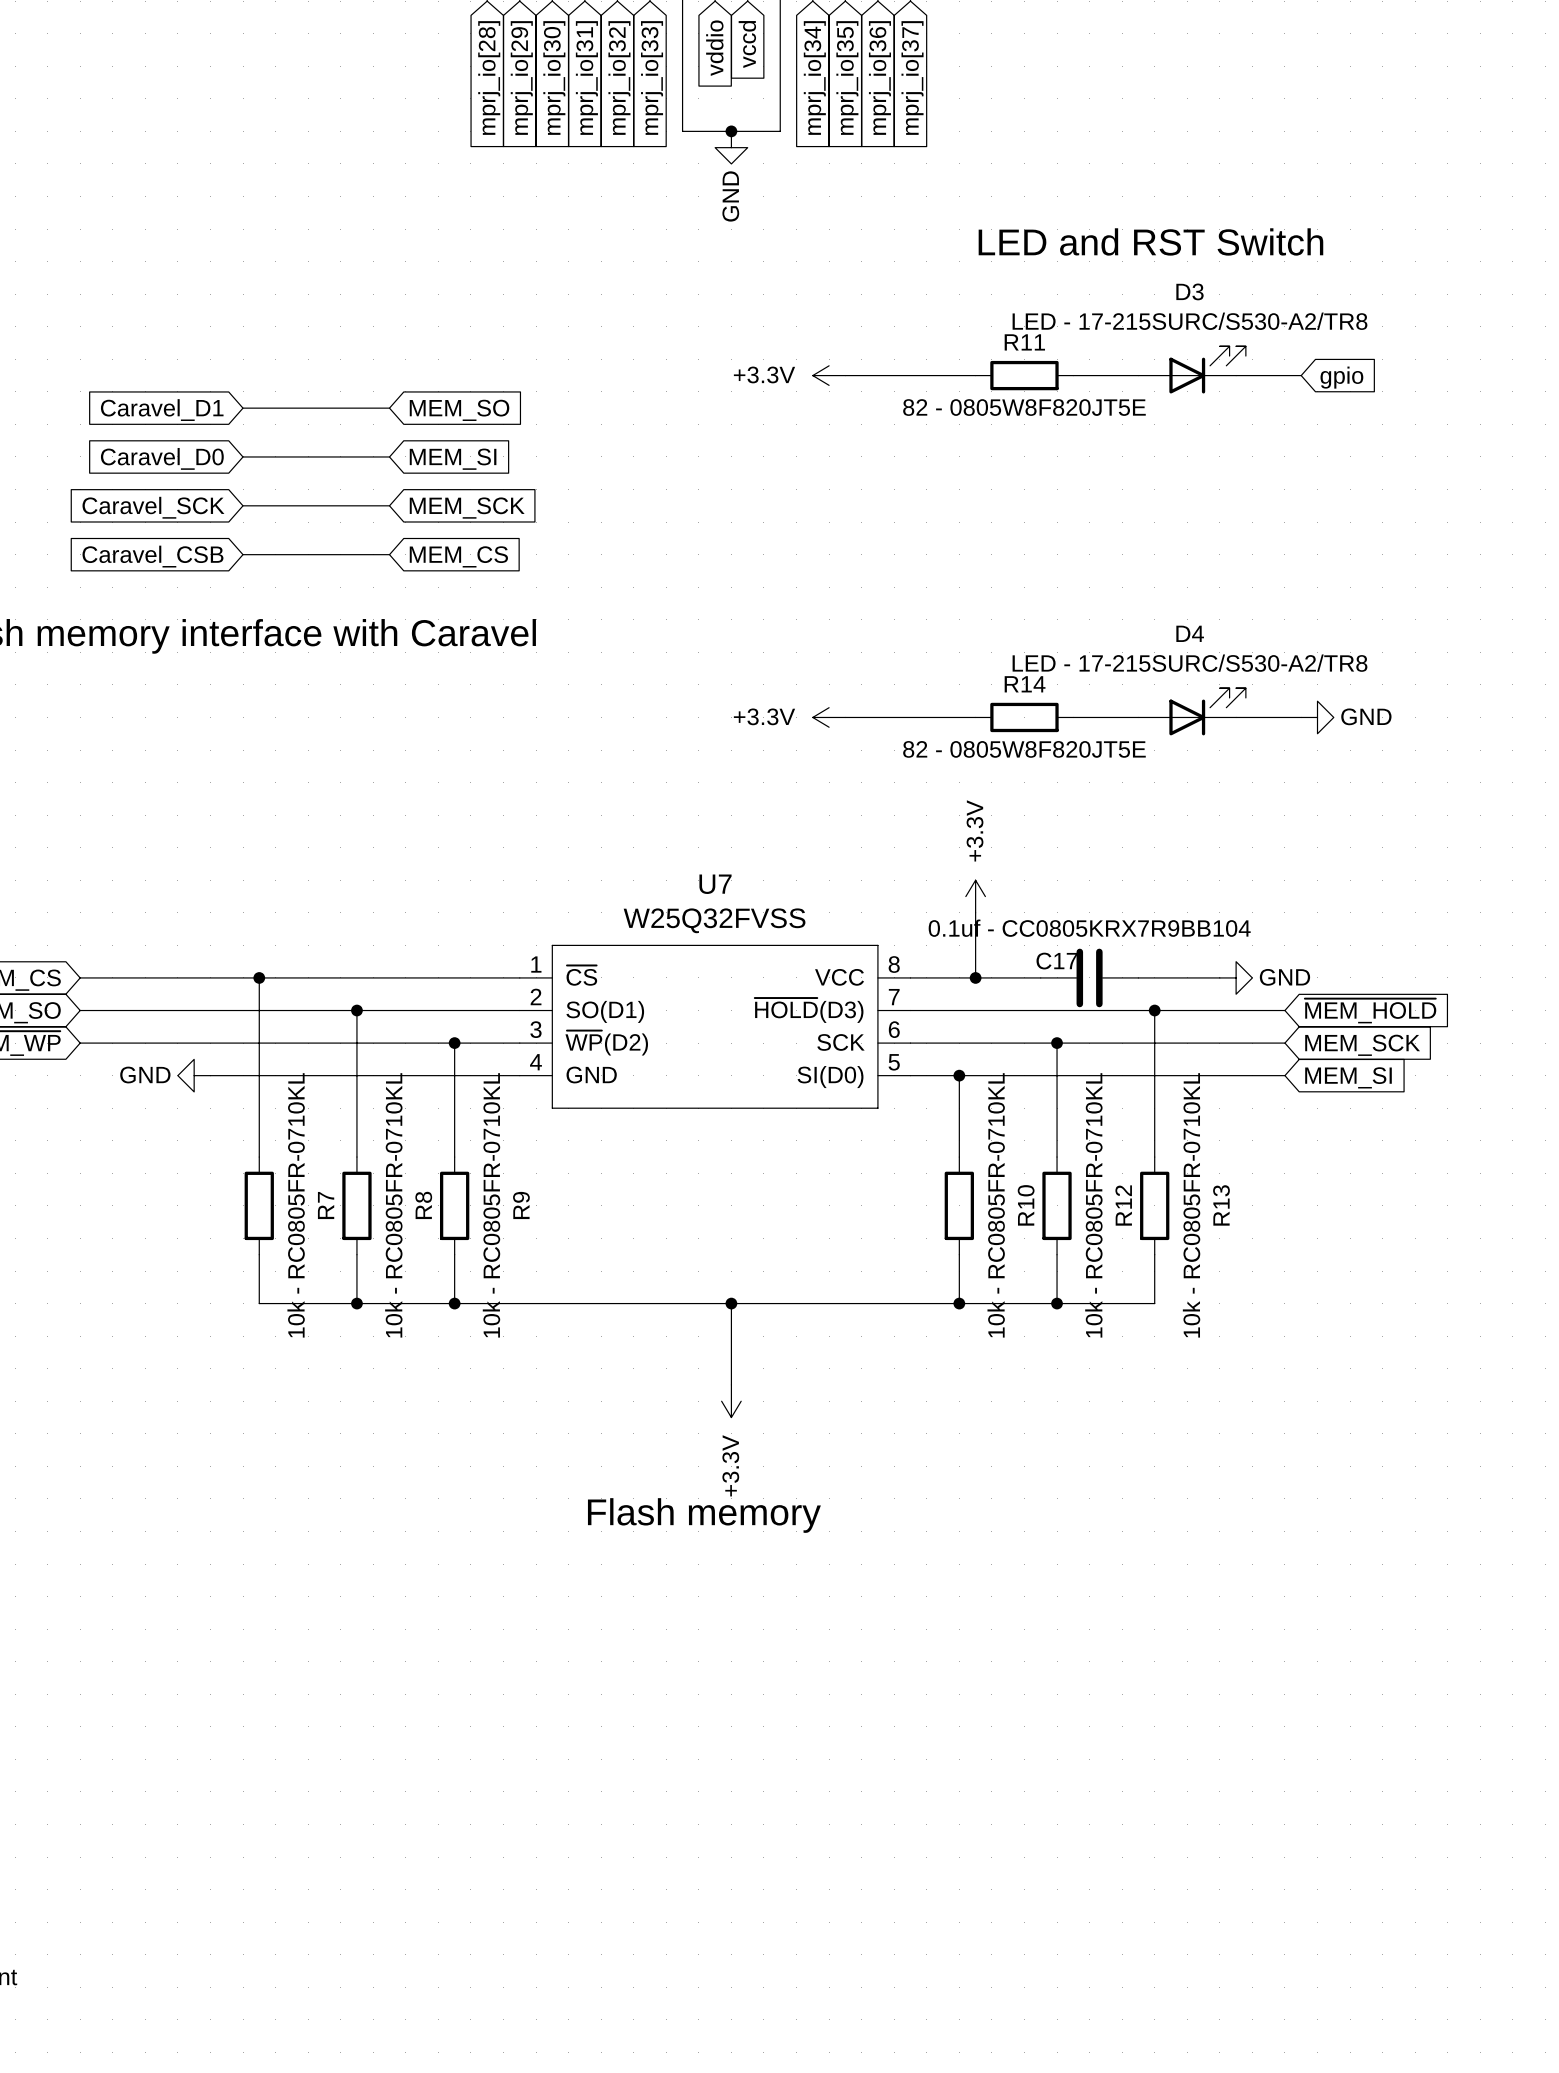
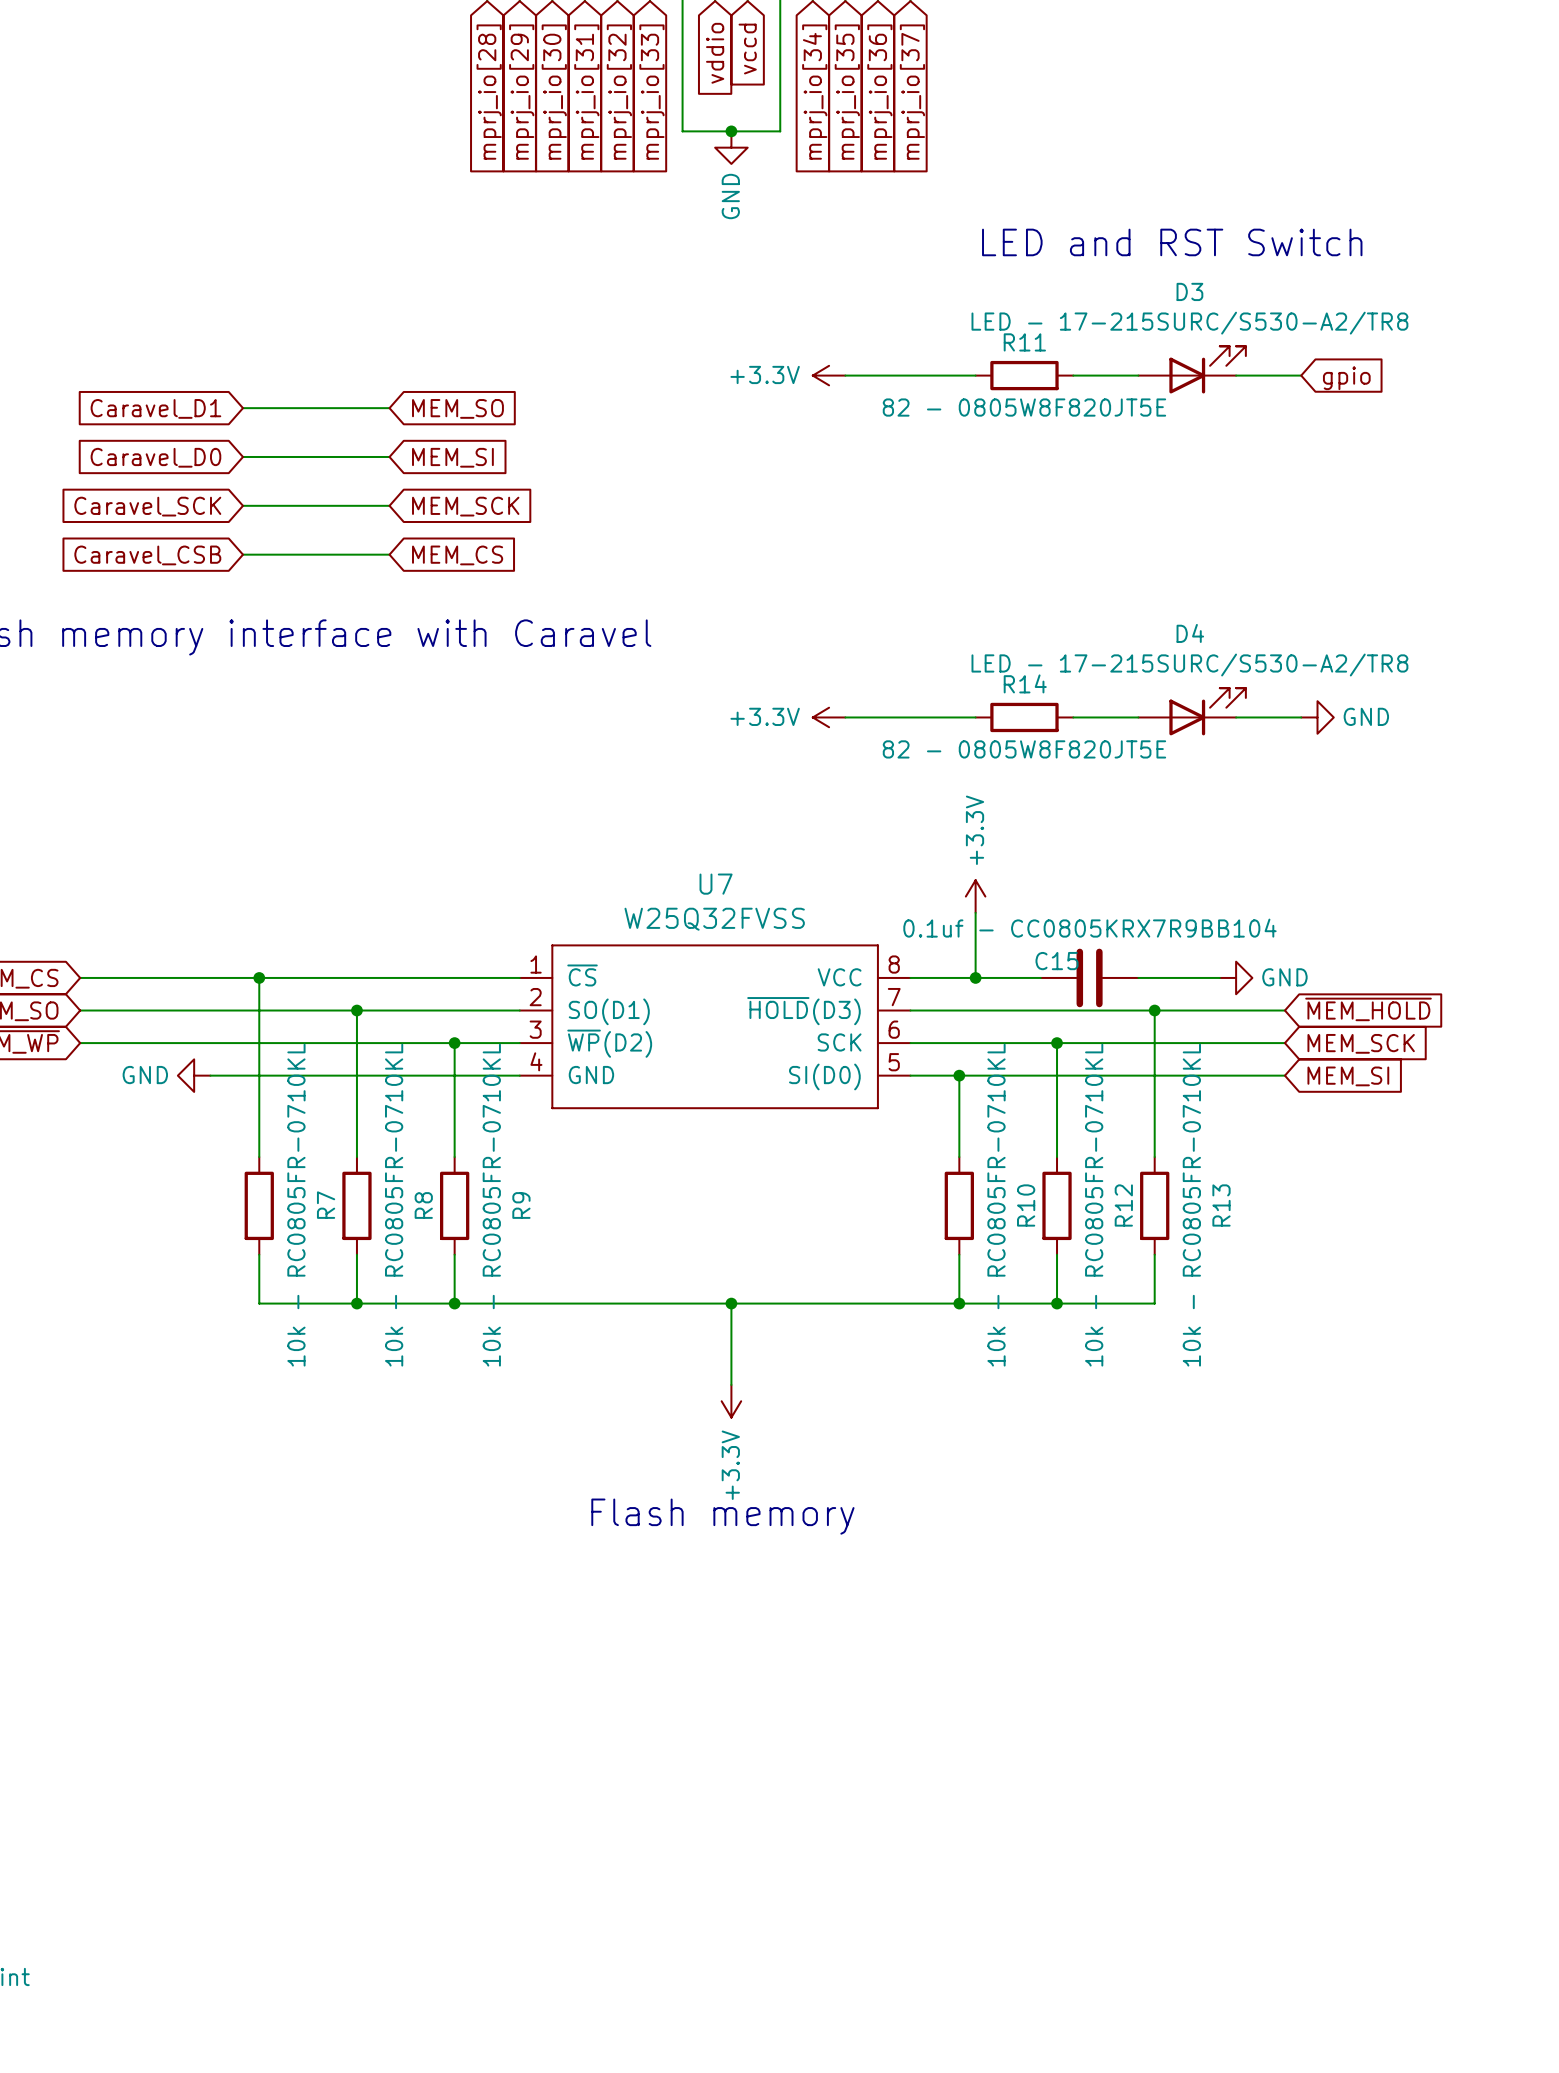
C17 name: C17 (1057, 961) -> C15 (1057, 961)

